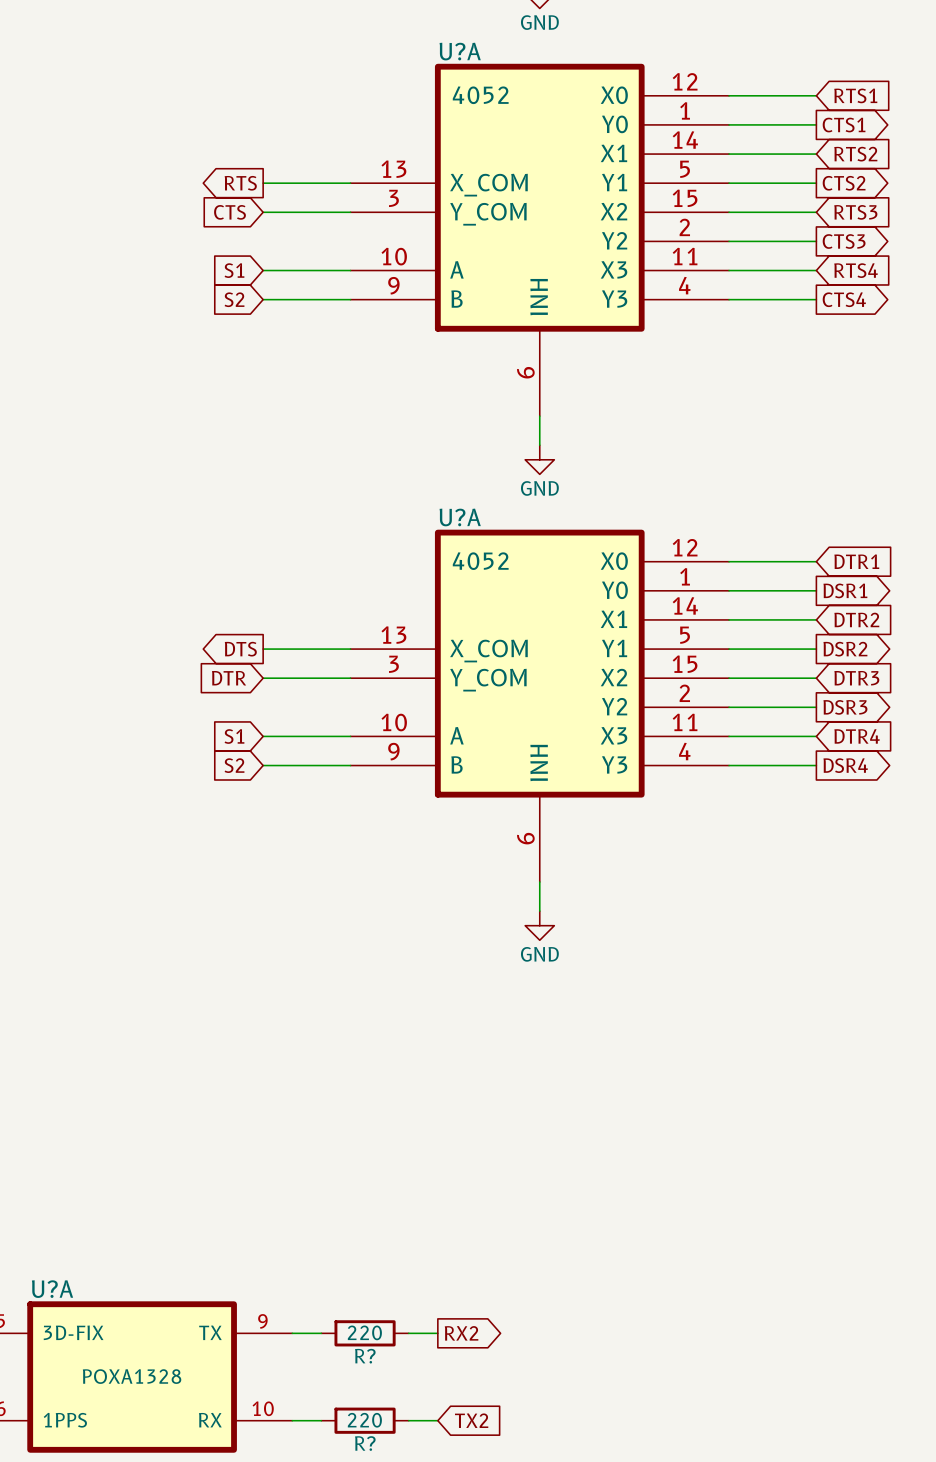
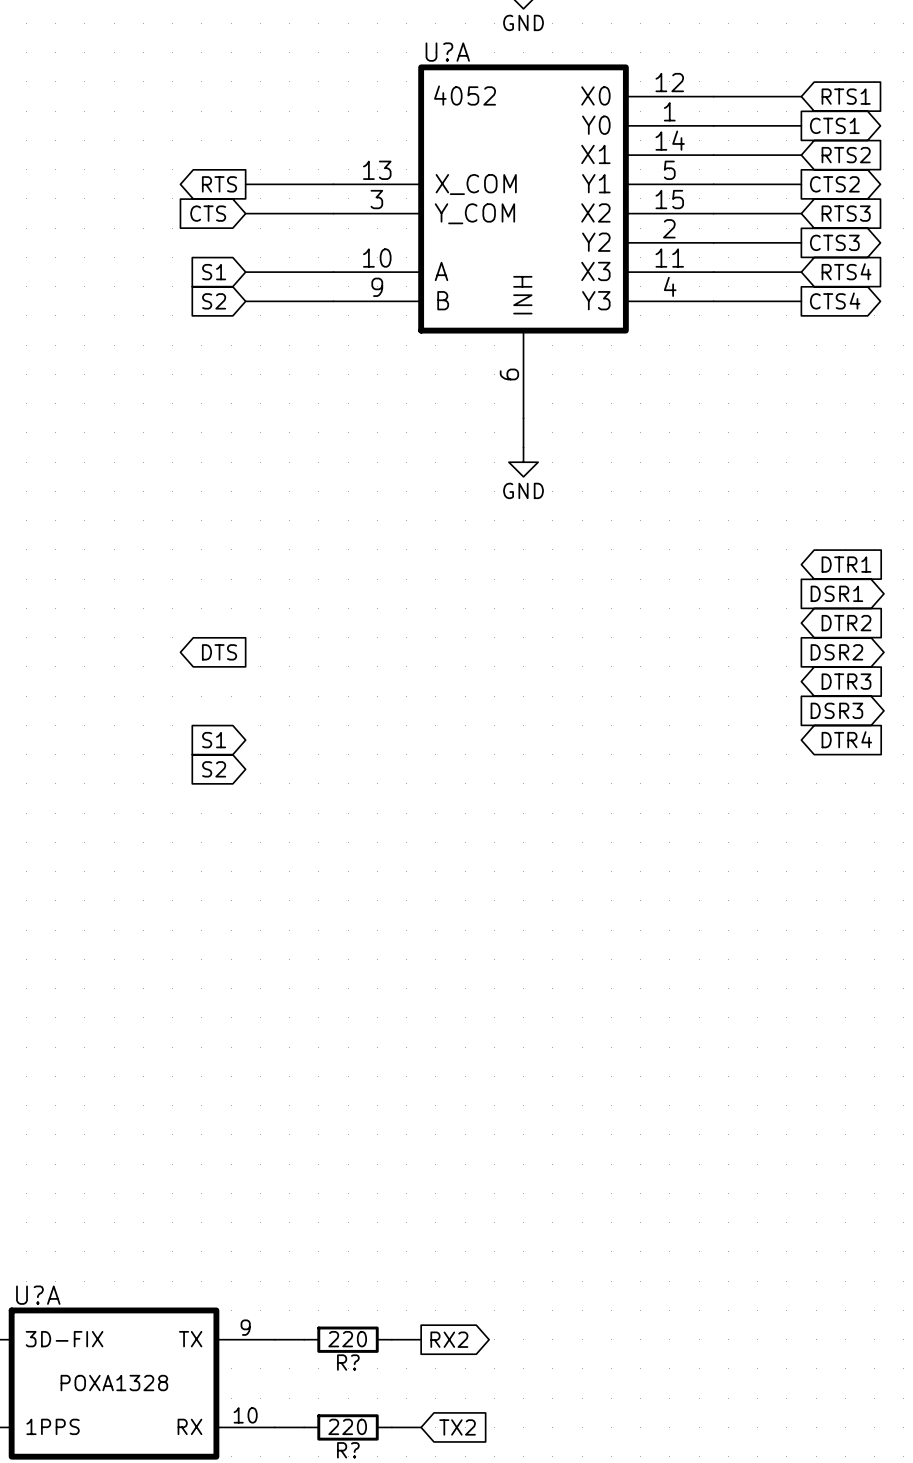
wire: (729, 561) (816, 561) -> none
wire: (729, 590) (816, 590) -> none
wire: (729, 619) (816, 619) -> none
wire: (263, 649) (350, 649) -> none
wire: (729, 649) (816, 649) -> none
global label: DTR (229, 678) -> none
wire: (263, 678) (350, 678) -> none
wire: (729, 678) (816, 678) -> none
U?A: (539, 705) -> none
wire: (729, 707) (816, 707) -> none
wire: (263, 736) (350, 736) -> none
wire: (729, 736) (816, 736) -> none
wire: (263, 765) (350, 765) -> none
wire: (729, 765) (816, 765) -> none
global label: DSR4 (845, 765) -> none
wire: (539, 882) (539, 911) -> none
power symbol: GND (539, 925) -> none

